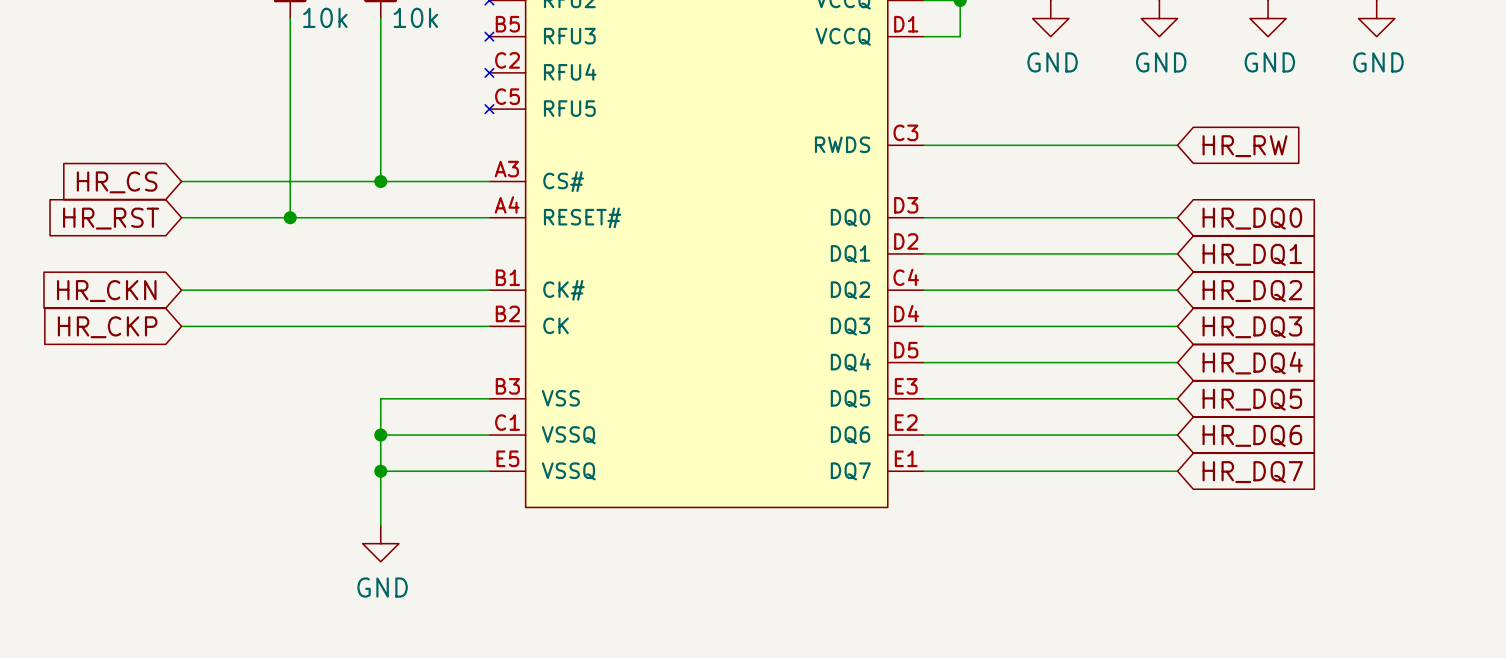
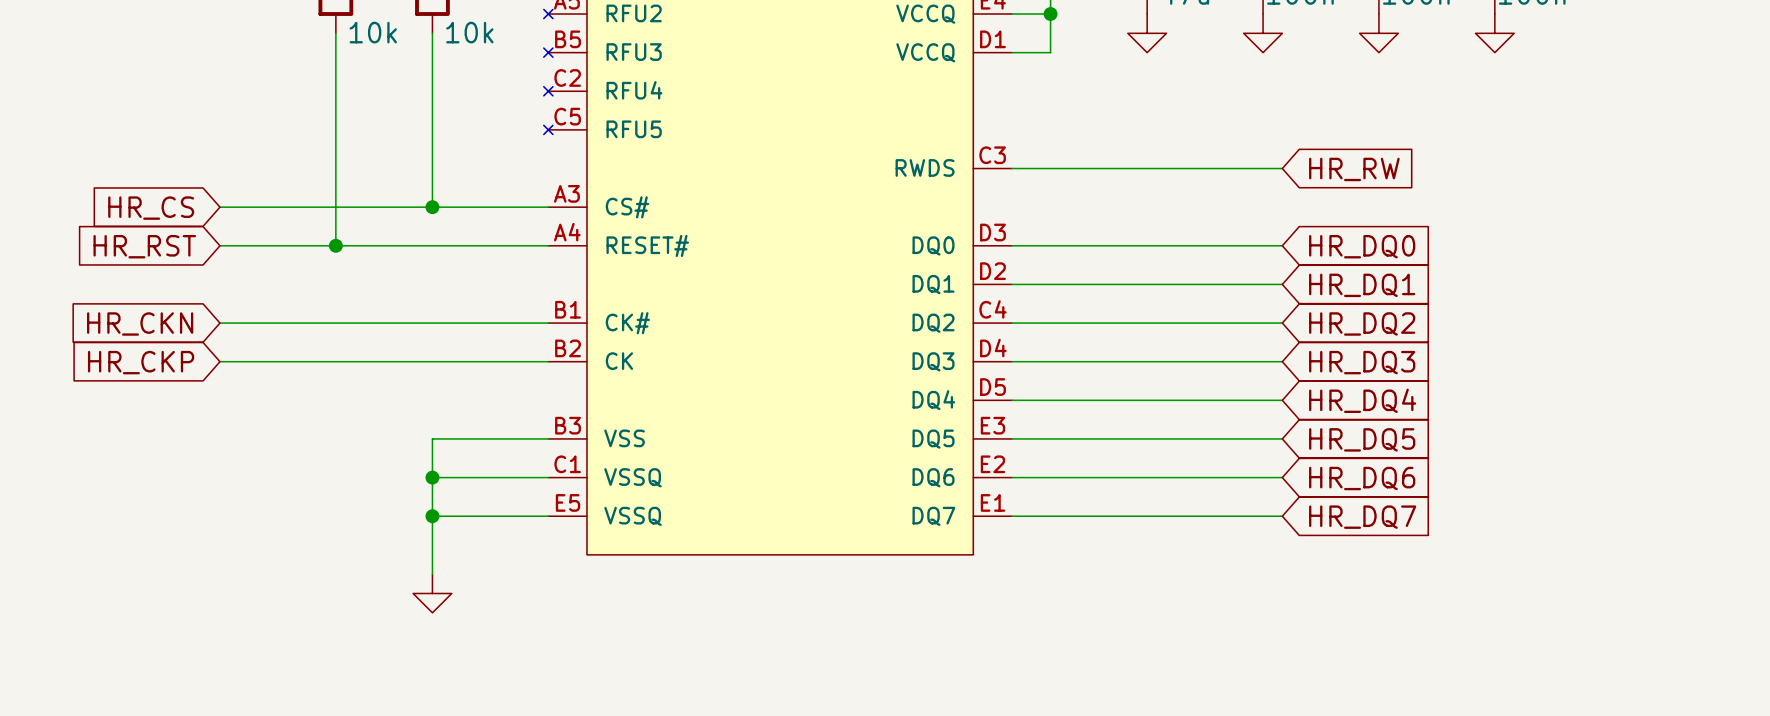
power symbol text: GND (1052, 62) -> none
power symbol text: GND (1161, 62) -> none
power symbol text: GND (1269, 62) -> none
power symbol text: GND (1378, 62) -> none
power symbol text: GND (382, 587) -> none

